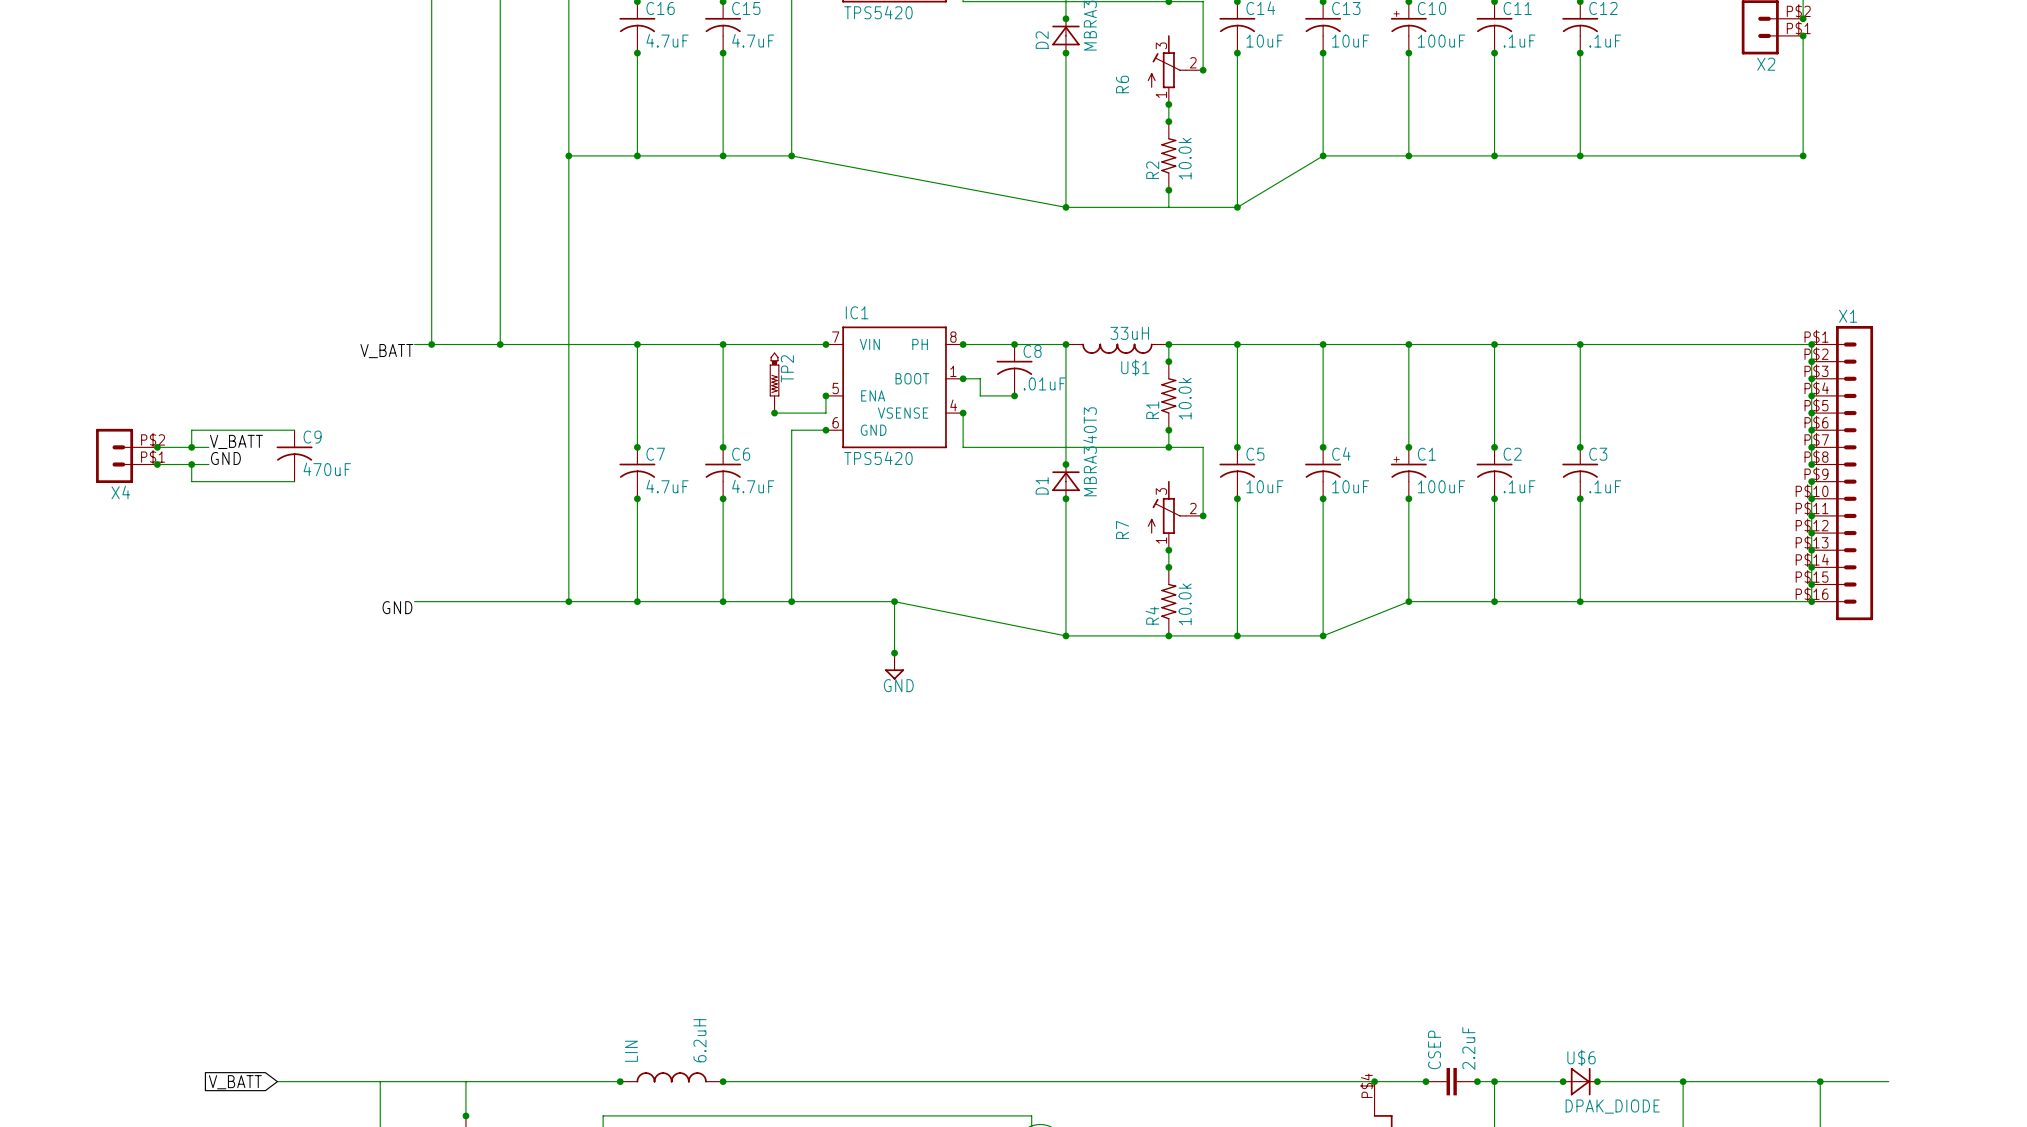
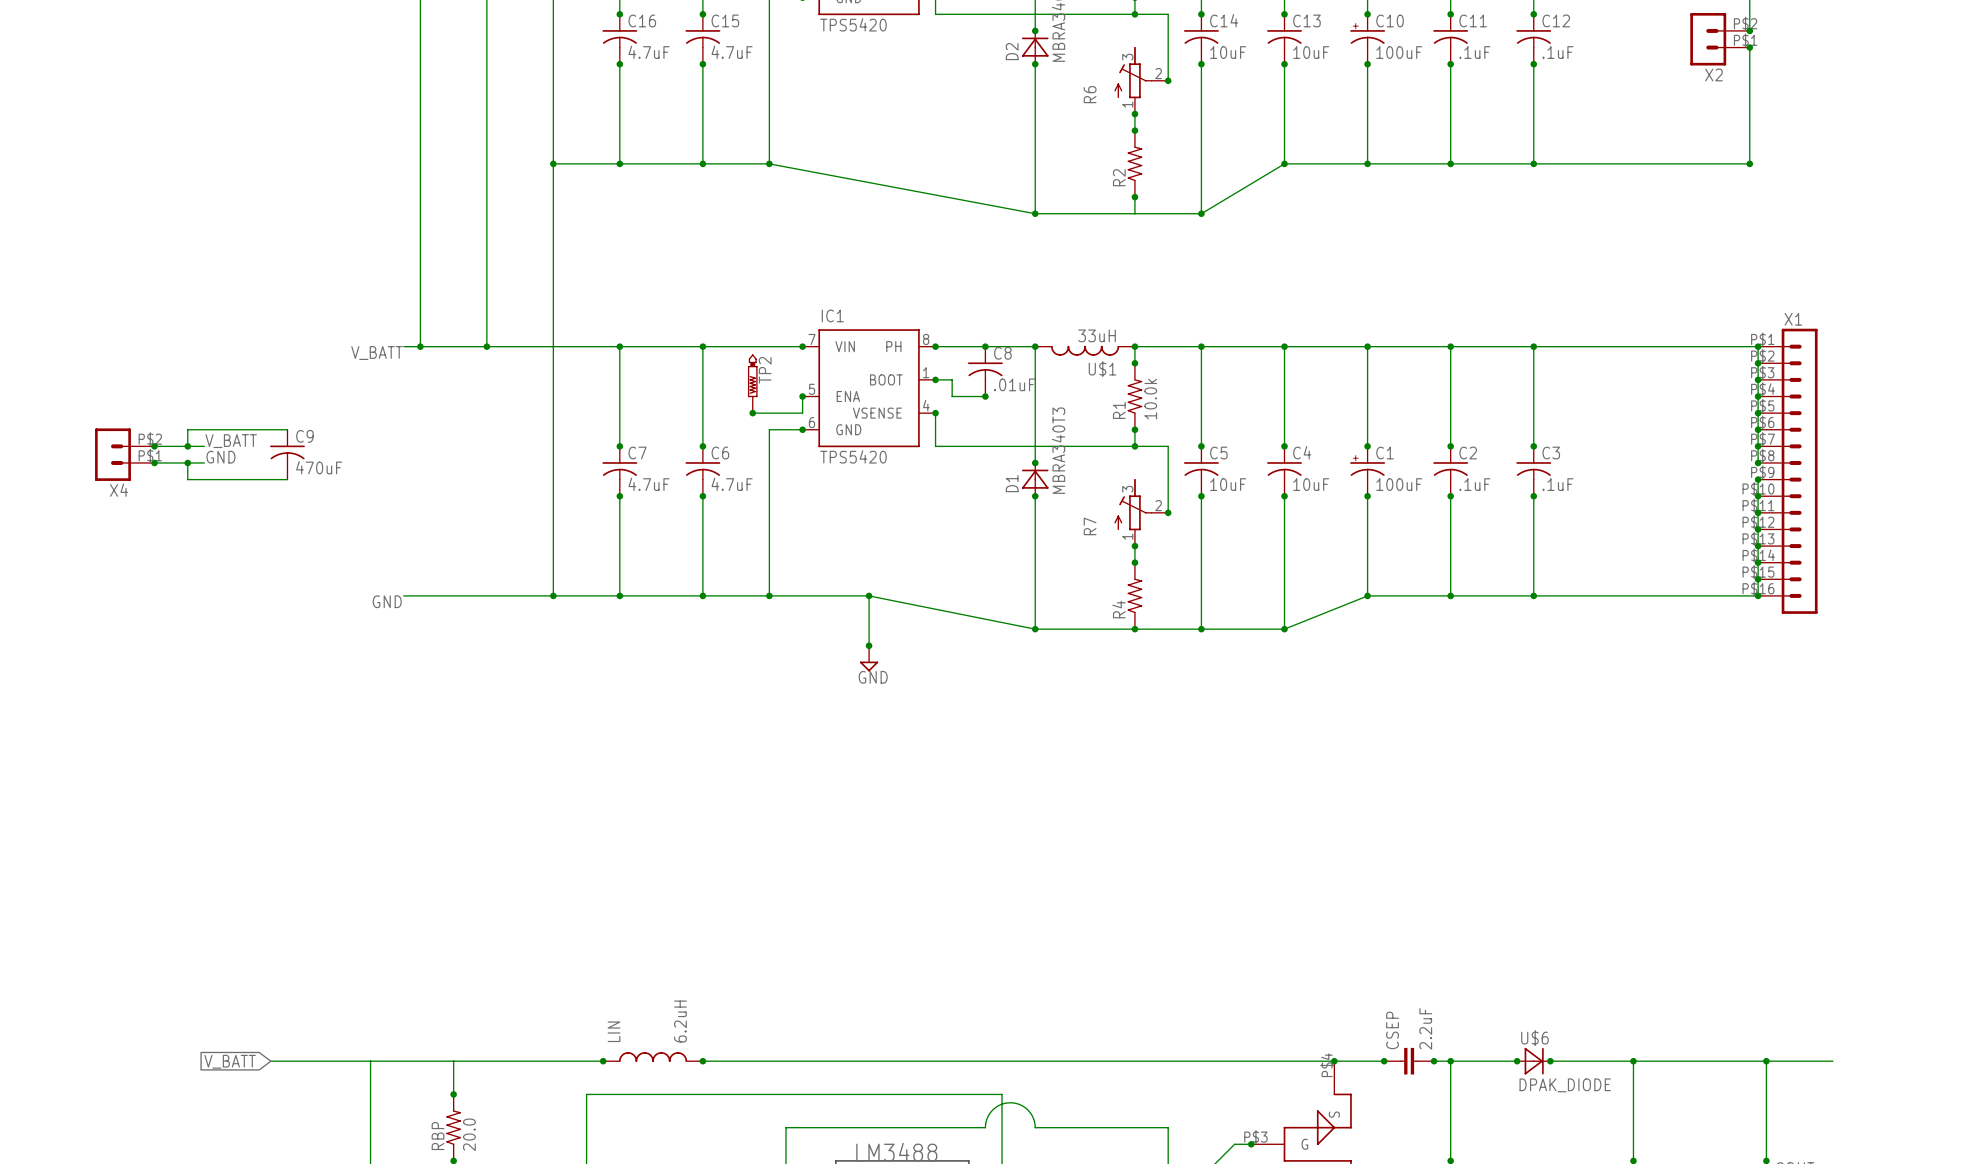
R2 value: 10.0k (1185, 158) -> none
R4 value: 10.0k (1185, 604) -> none

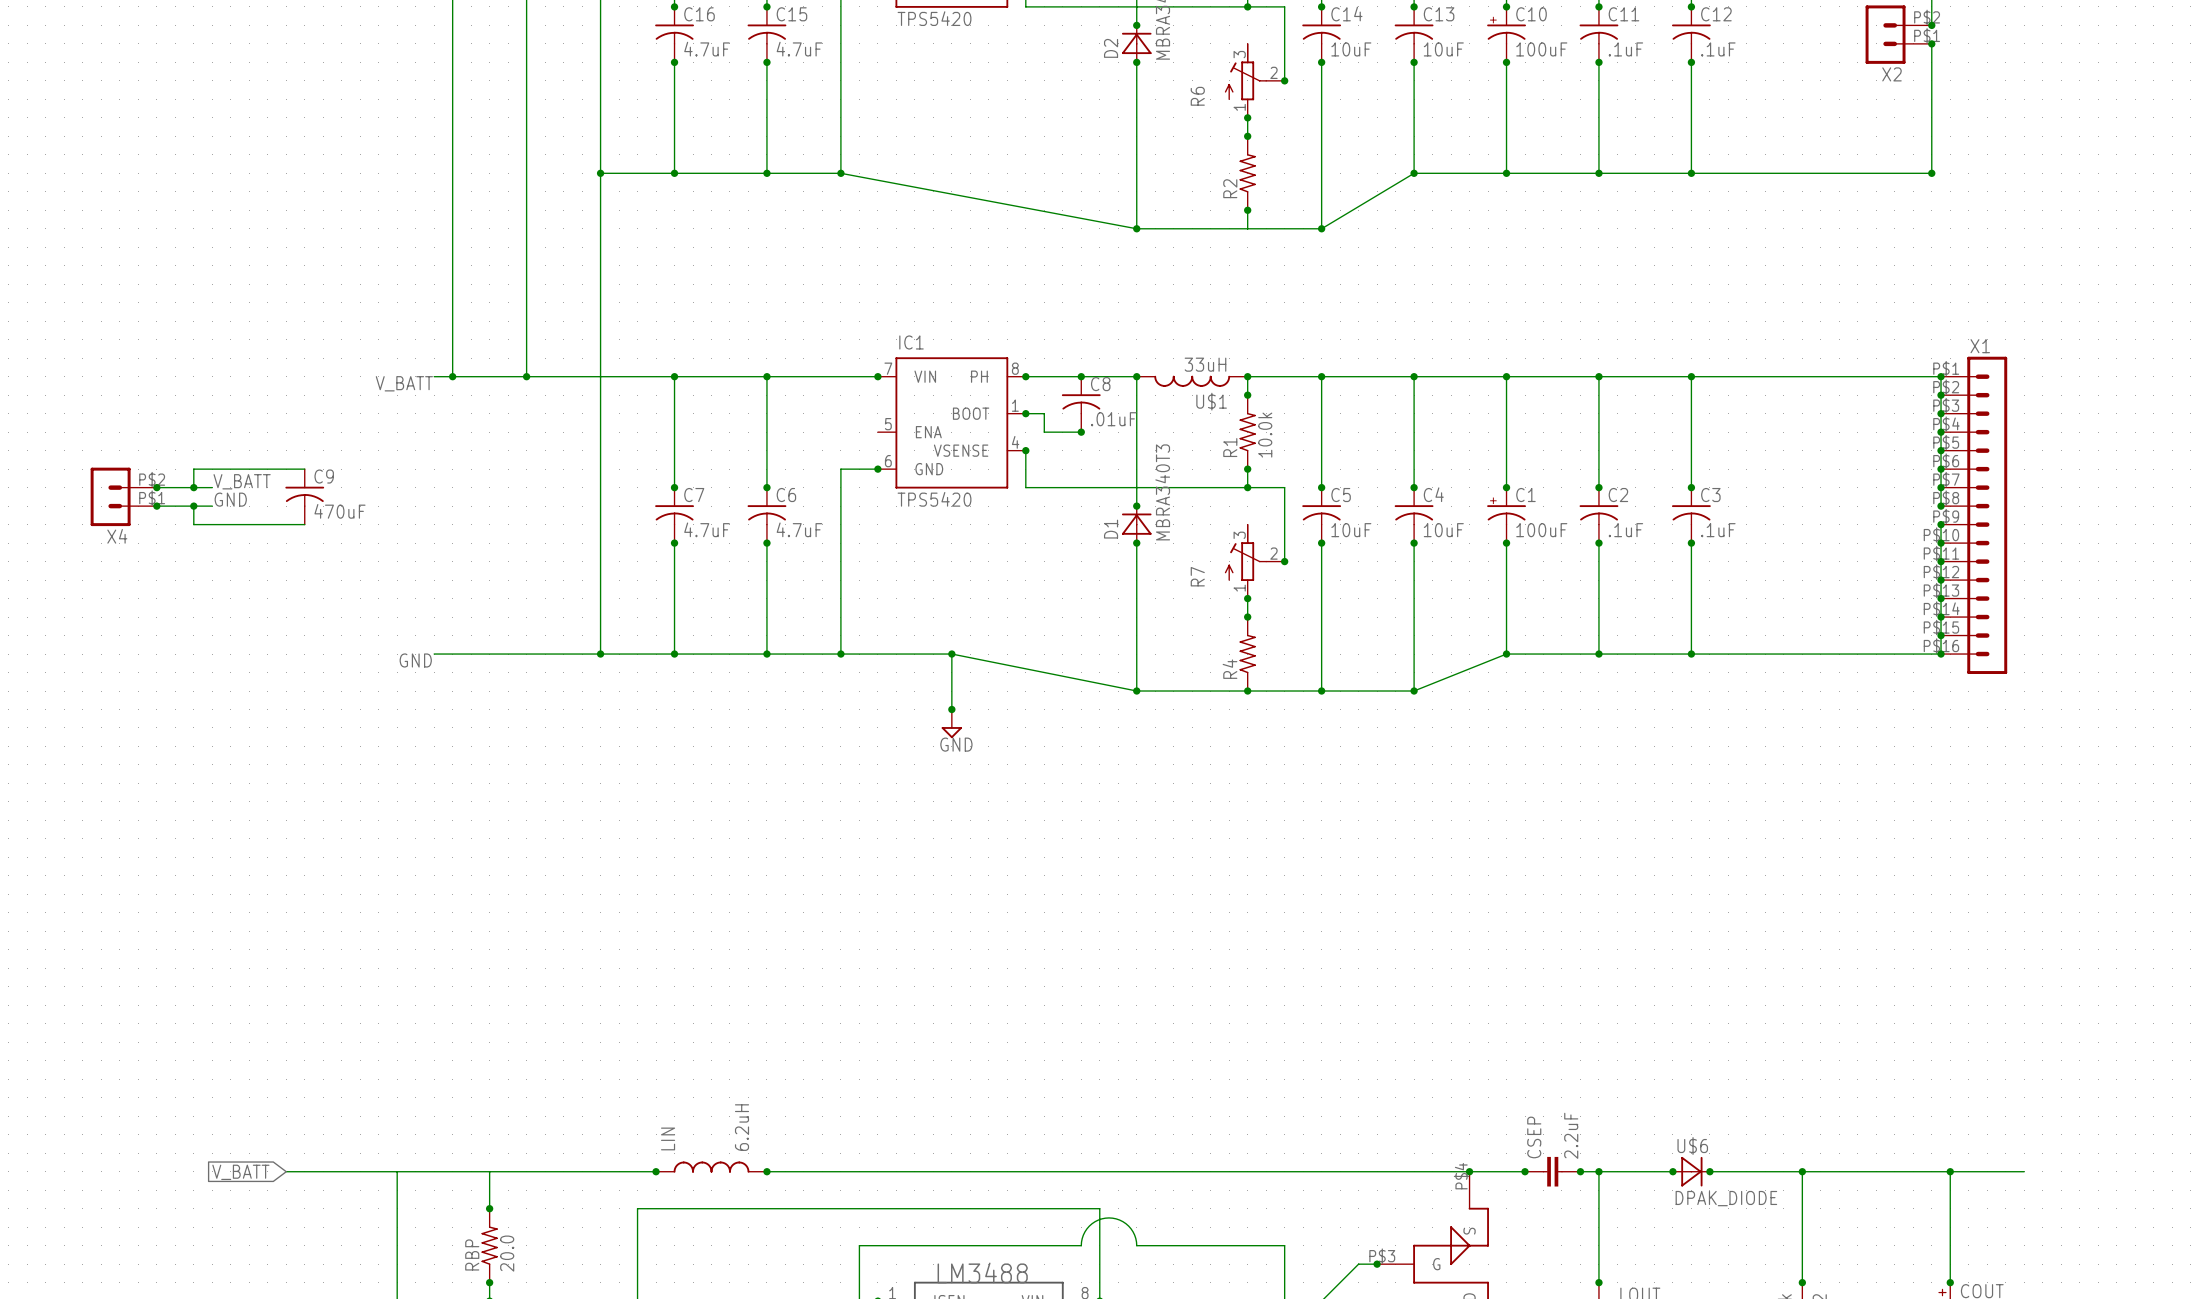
TP2: (752, 383) -> none
wire: (802, 396) (802, 413) (752, 413) -> none
junction: (802, 396) -> none
junction: (752, 413) -> none

